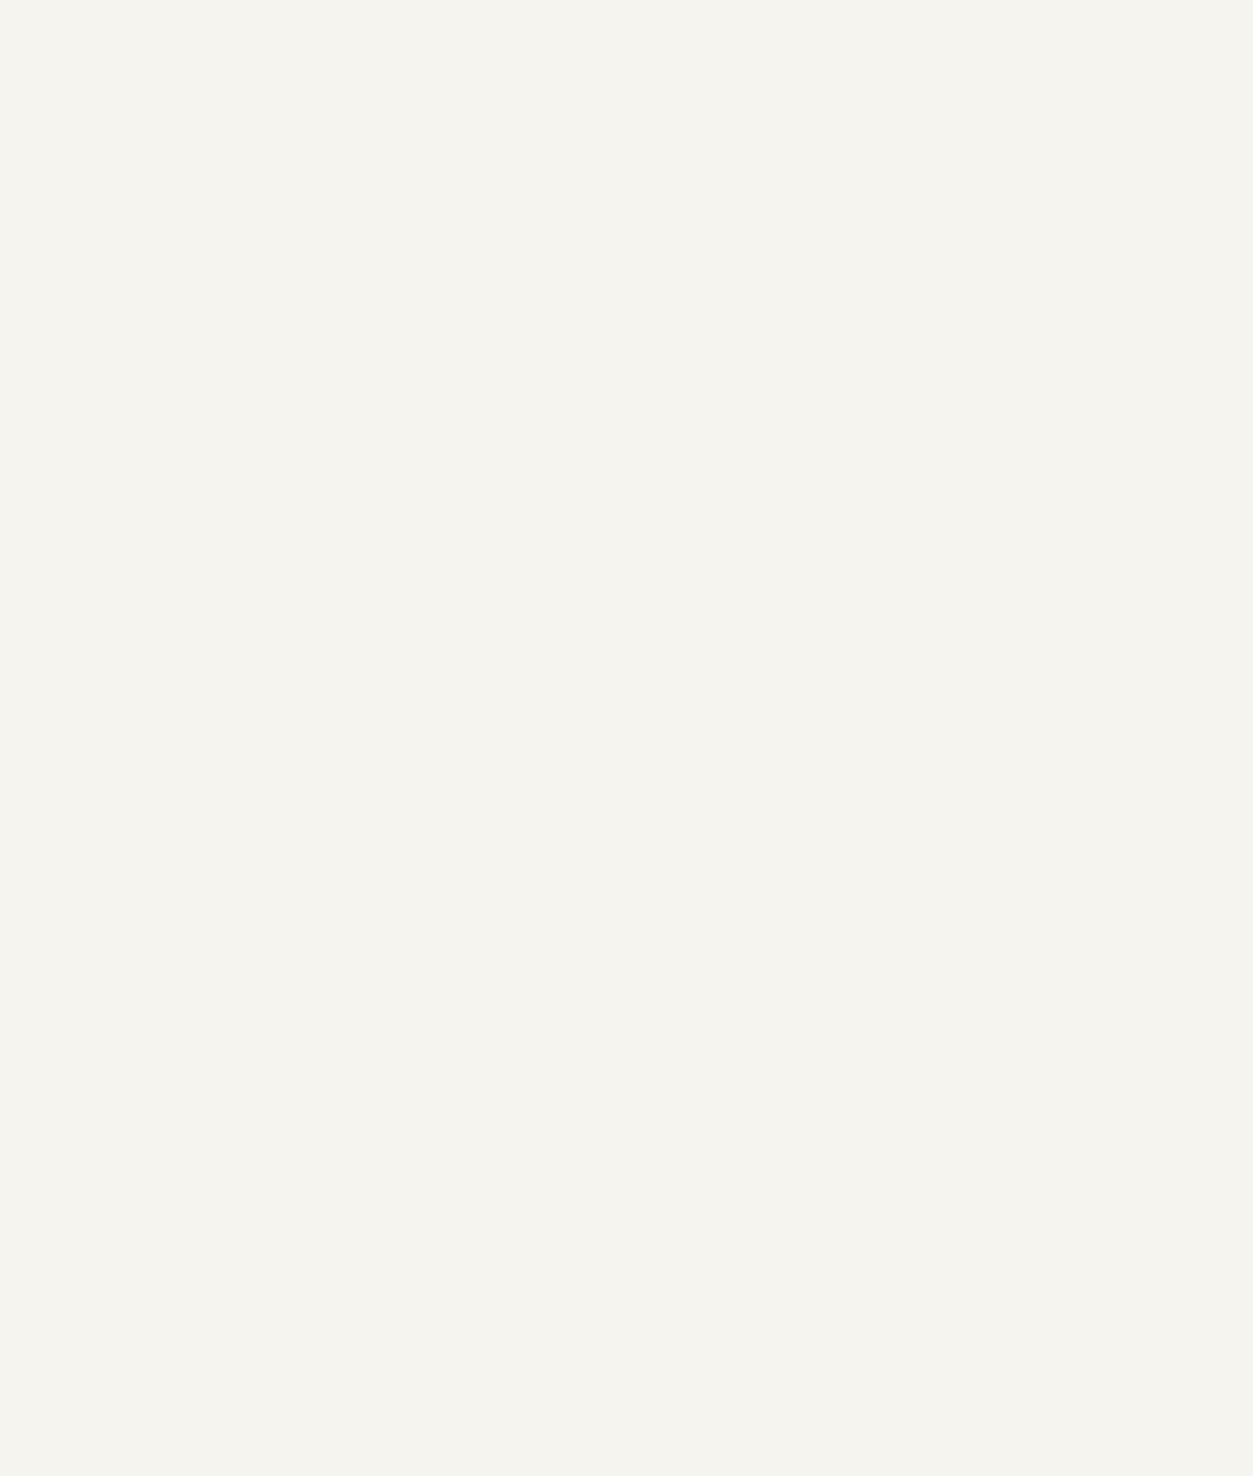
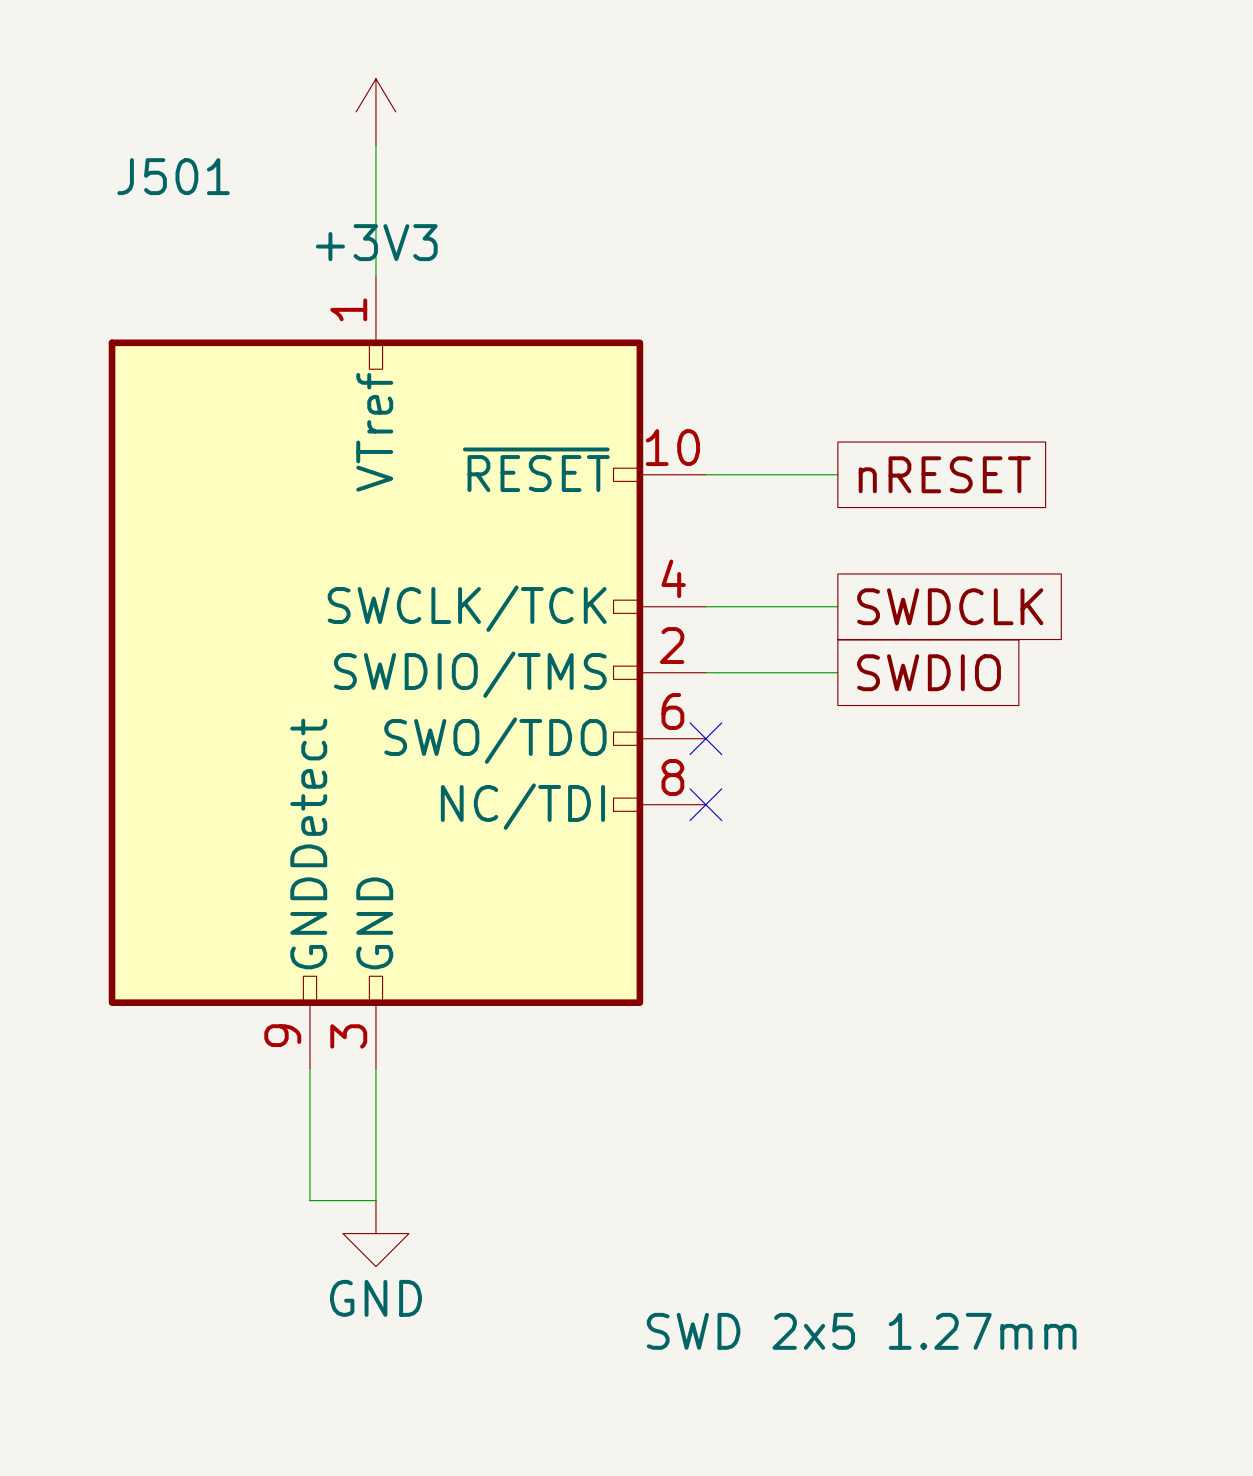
power symbol: none -> +3V3 (375, 111)
wire: none -> (375, 144) (375, 276)
wire: none -> (705, 474) (837, 474)
global label: none -> nRESET (944, 474)
wire: none -> (705, 606) (837, 606)
global label: none -> SWDCLK (950, 606)
J501: none -> SWD 2x5 1.27mm (407, 672)
wire: none -> (705, 672) (837, 672)
global label: none -> SWDIO (929, 672)
no-connect mark: none -> (705, 738)
no-connect mark: none -> (705, 804)
wire: none -> (309, 1068) (309, 1200) (375, 1200) (375, 1068)
power symbol: none -> GND (375, 1233)

